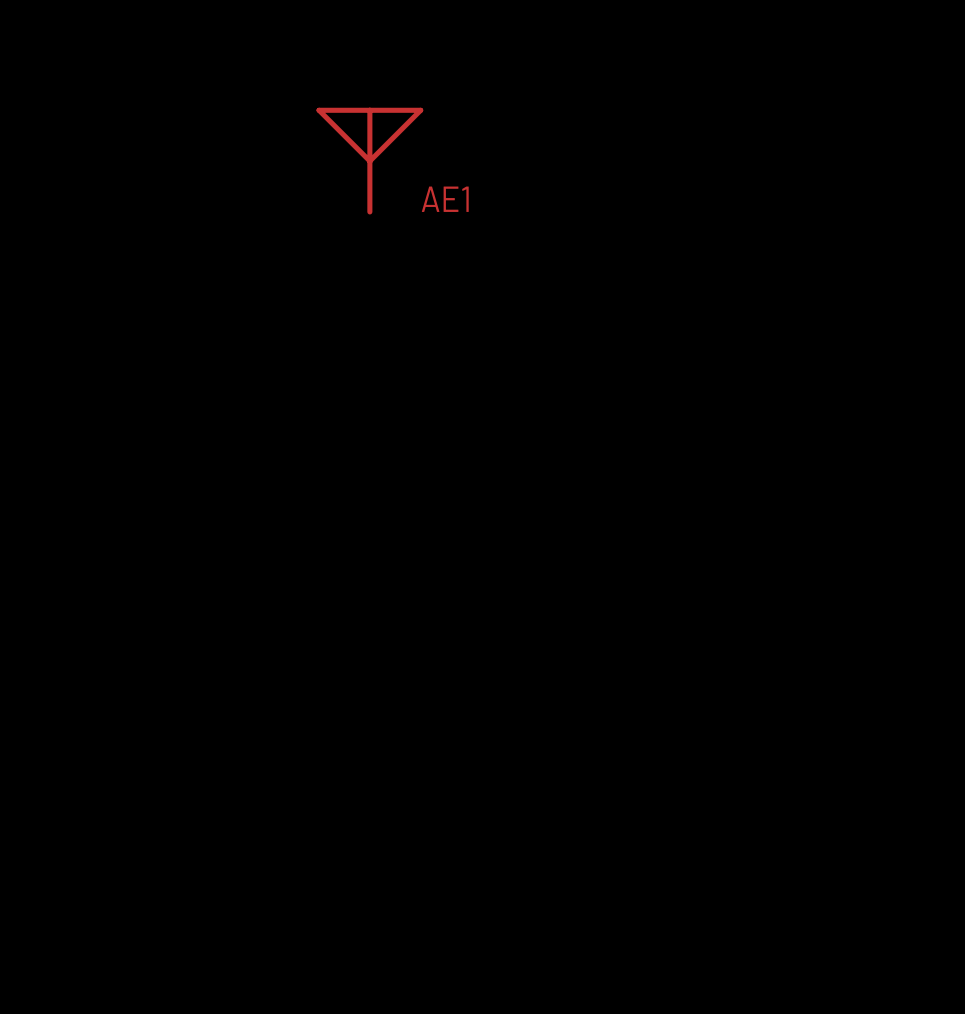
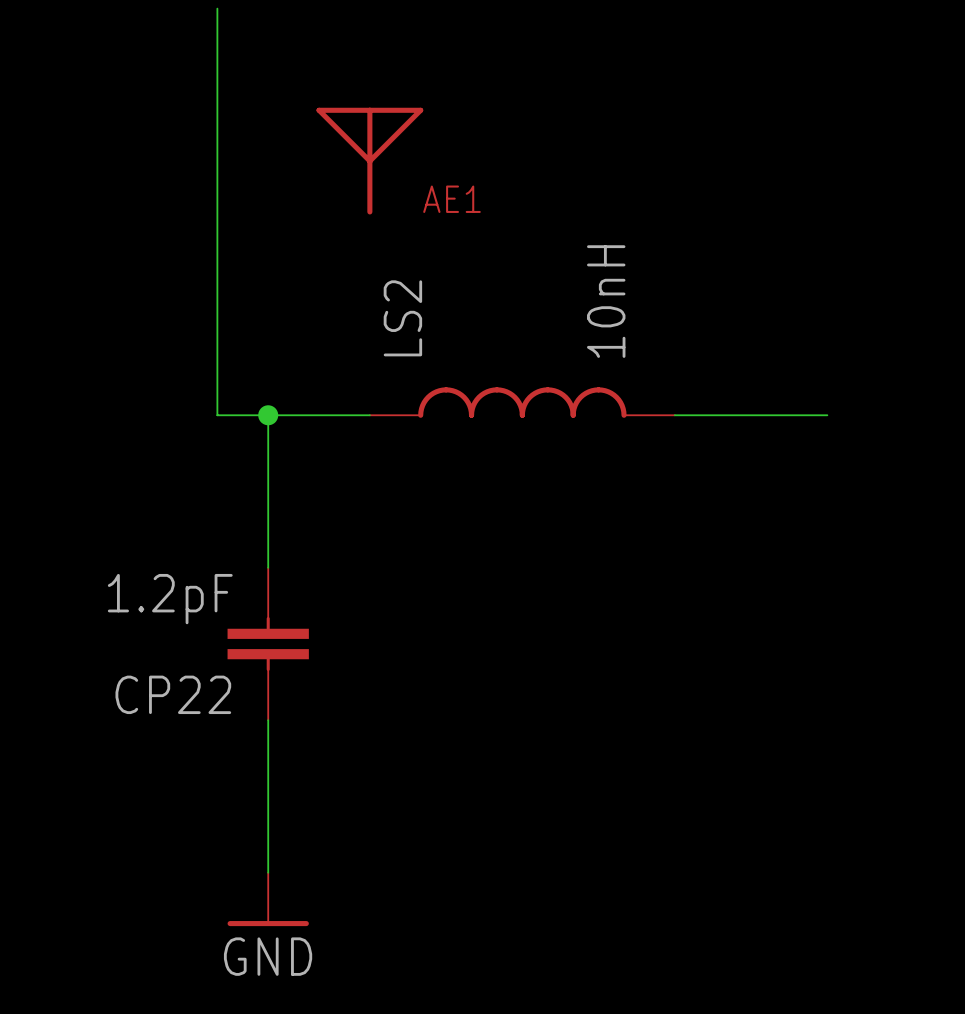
wire: none -> (217, 8) (217, 415) (369, 415)
LS2: none -> 10nH (522, 402)
wire: none -> (268, 415) (268, 567)
junction: none -> (268, 415)
wire: none -> (674, 415) (827, 415)
CP22: none -> 1.2pF (268, 644)
wire: none -> (268, 720) (268, 872)
power symbol: none -> GND (268, 899)

